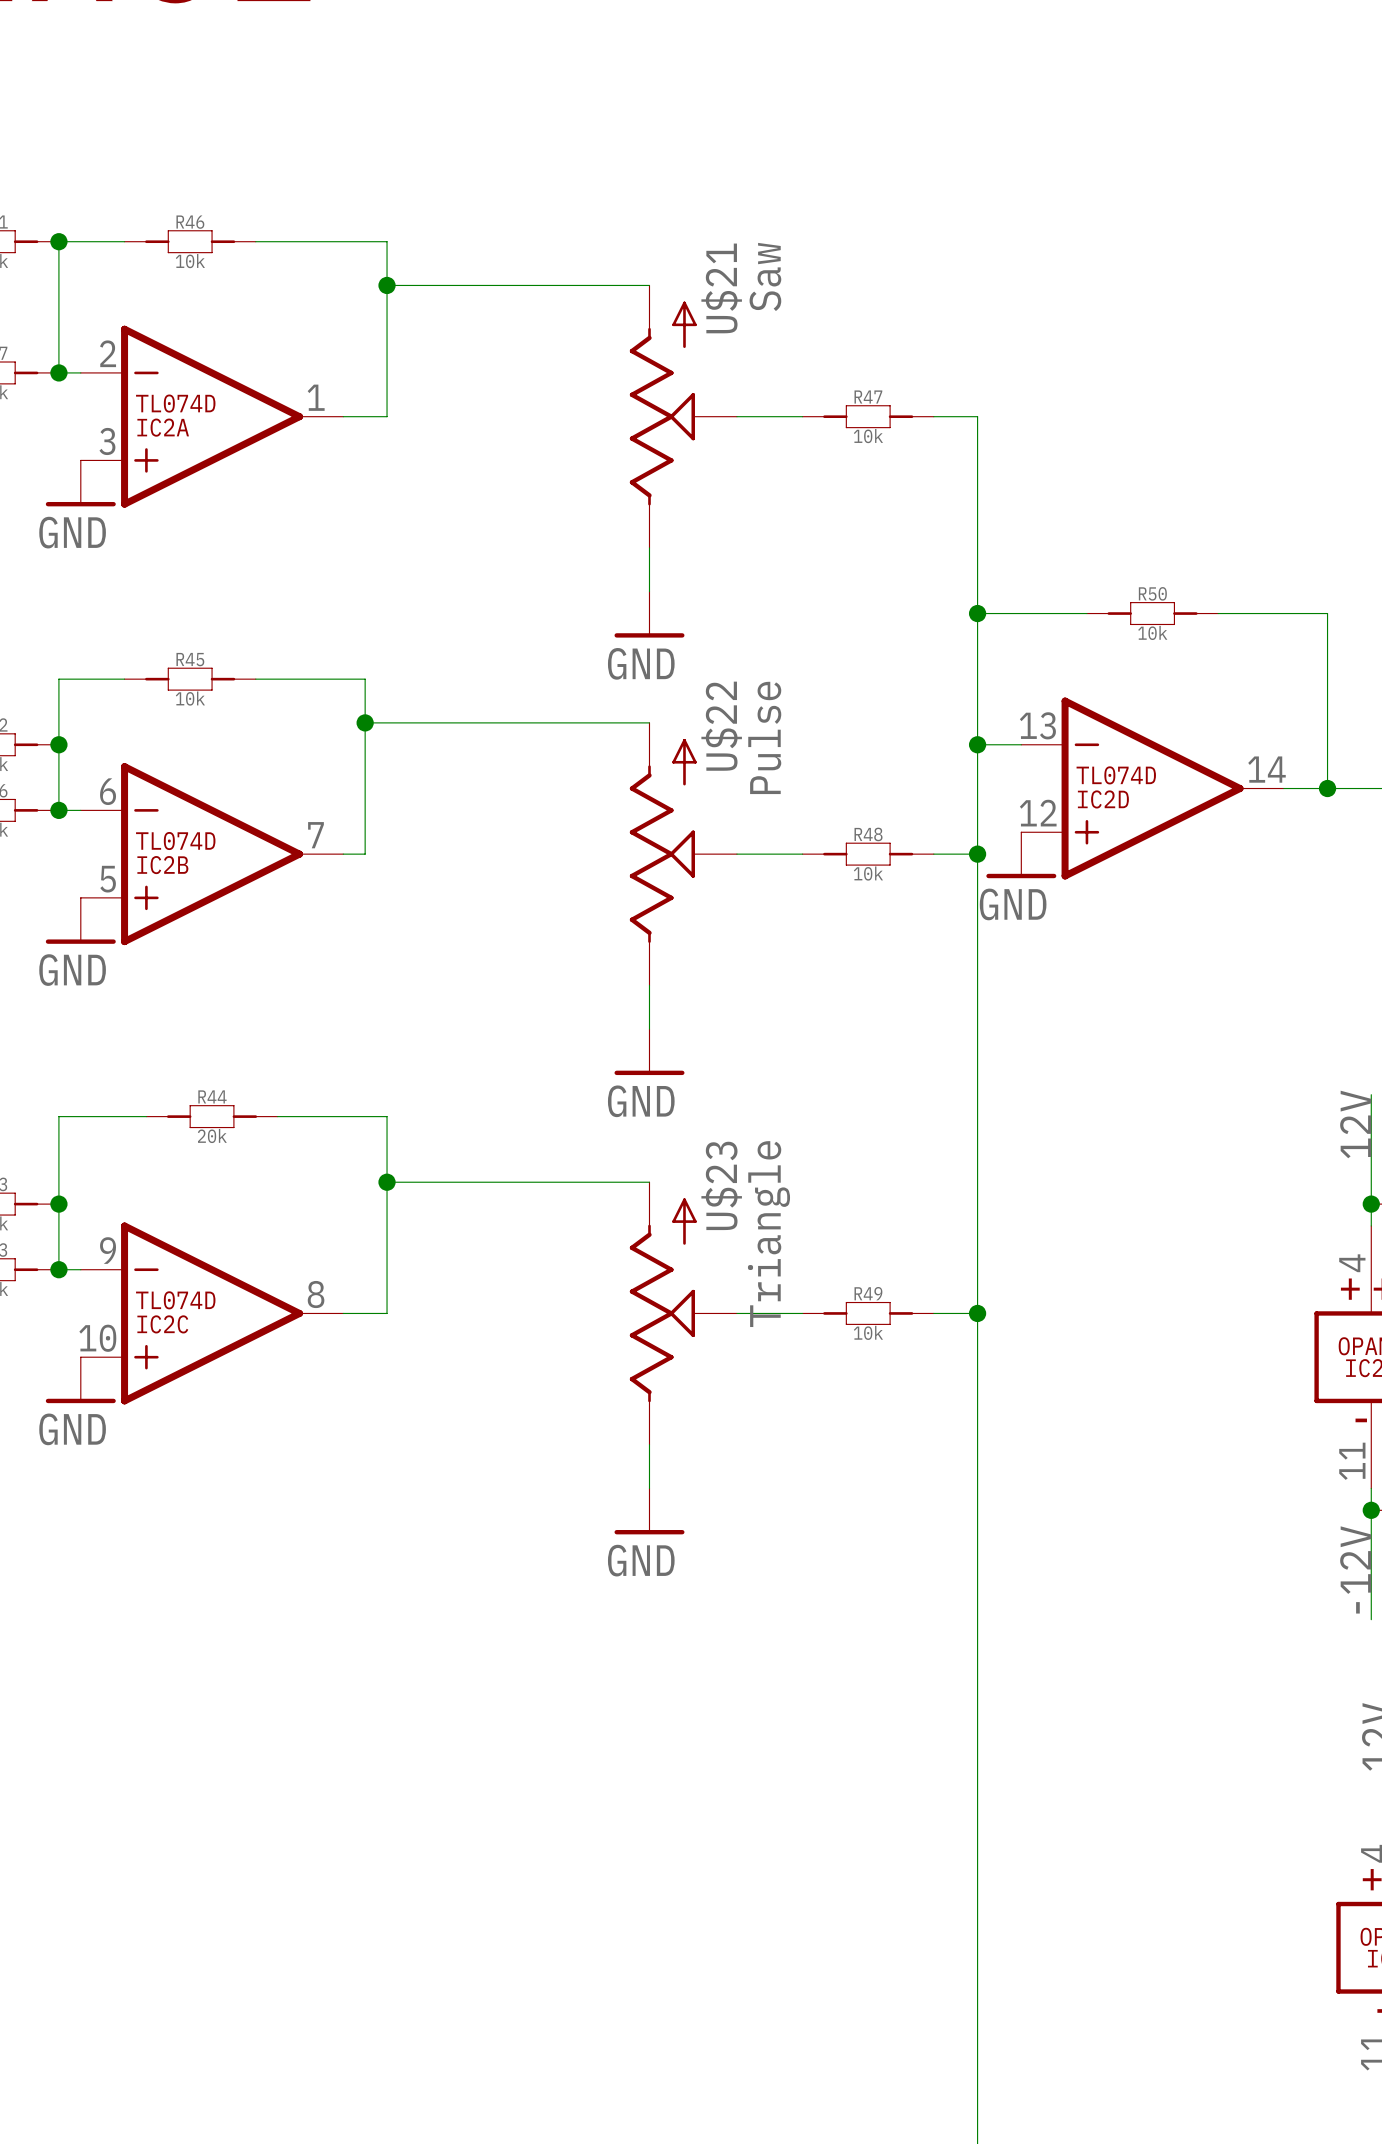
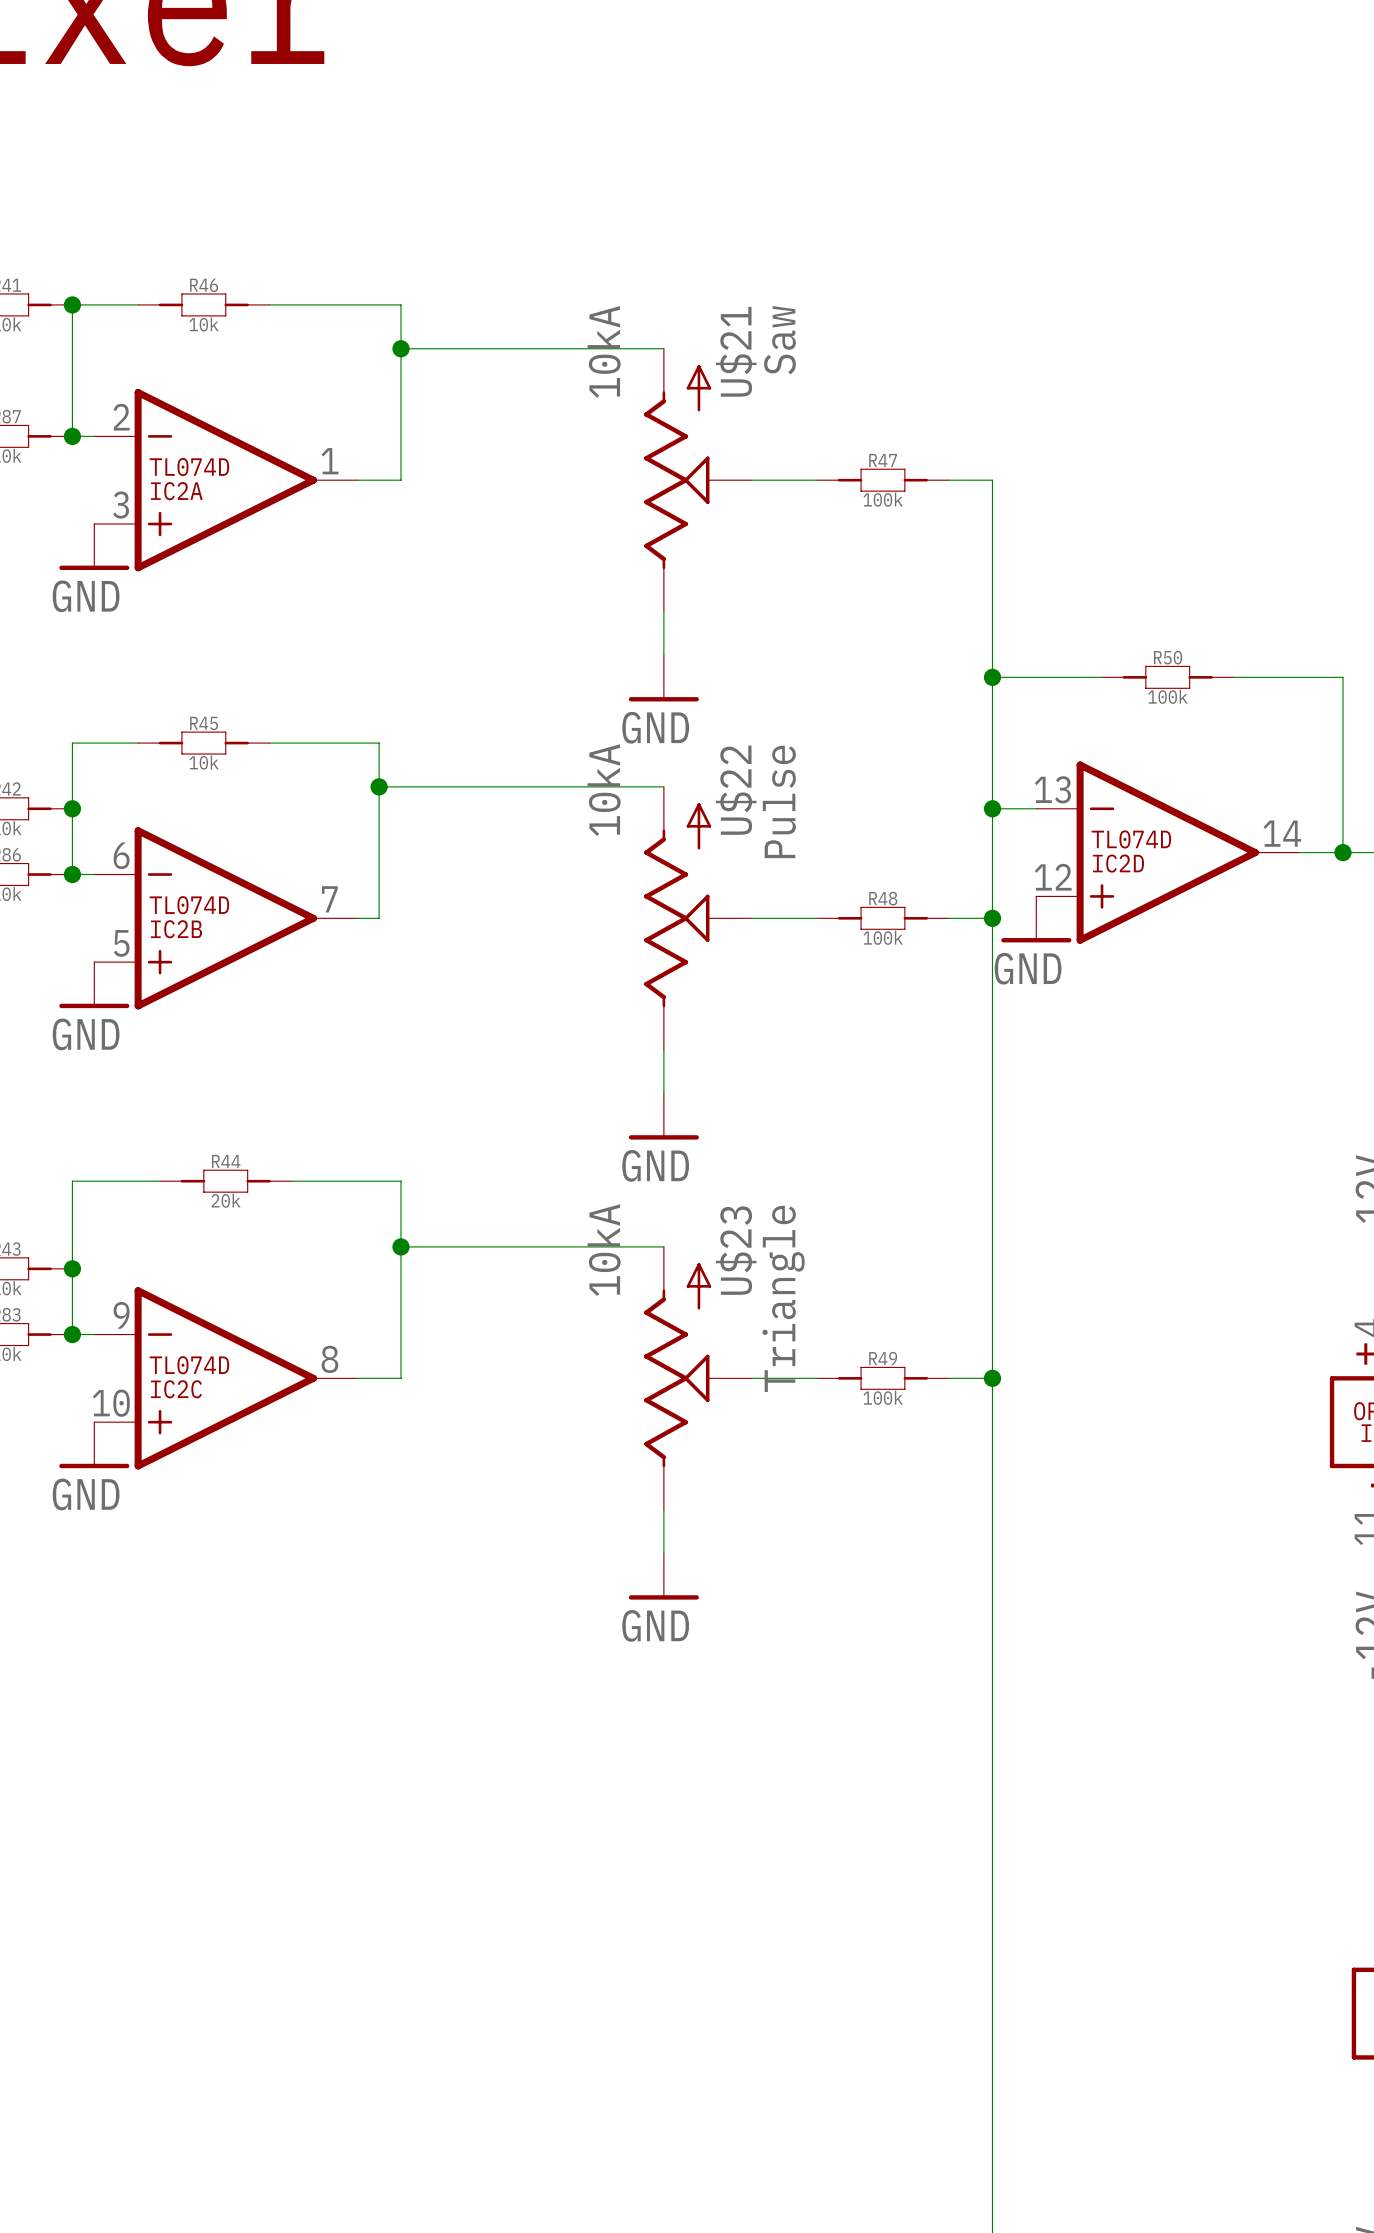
U$21 value: none -> 10kA (604, 351)
R47 value: 10k (868, 436) -> 100k (883, 499)
R50 value: 10k (1152, 632) -> 100k (1167, 696)
U$22 value: none -> 10kA (604, 790)
R48 value: 10k (868, 873) -> 100k (883, 937)
U$23 value: none -> 10kA (604, 1250)
R49 value: 10k (868, 1332) -> 100k (883, 1397)

